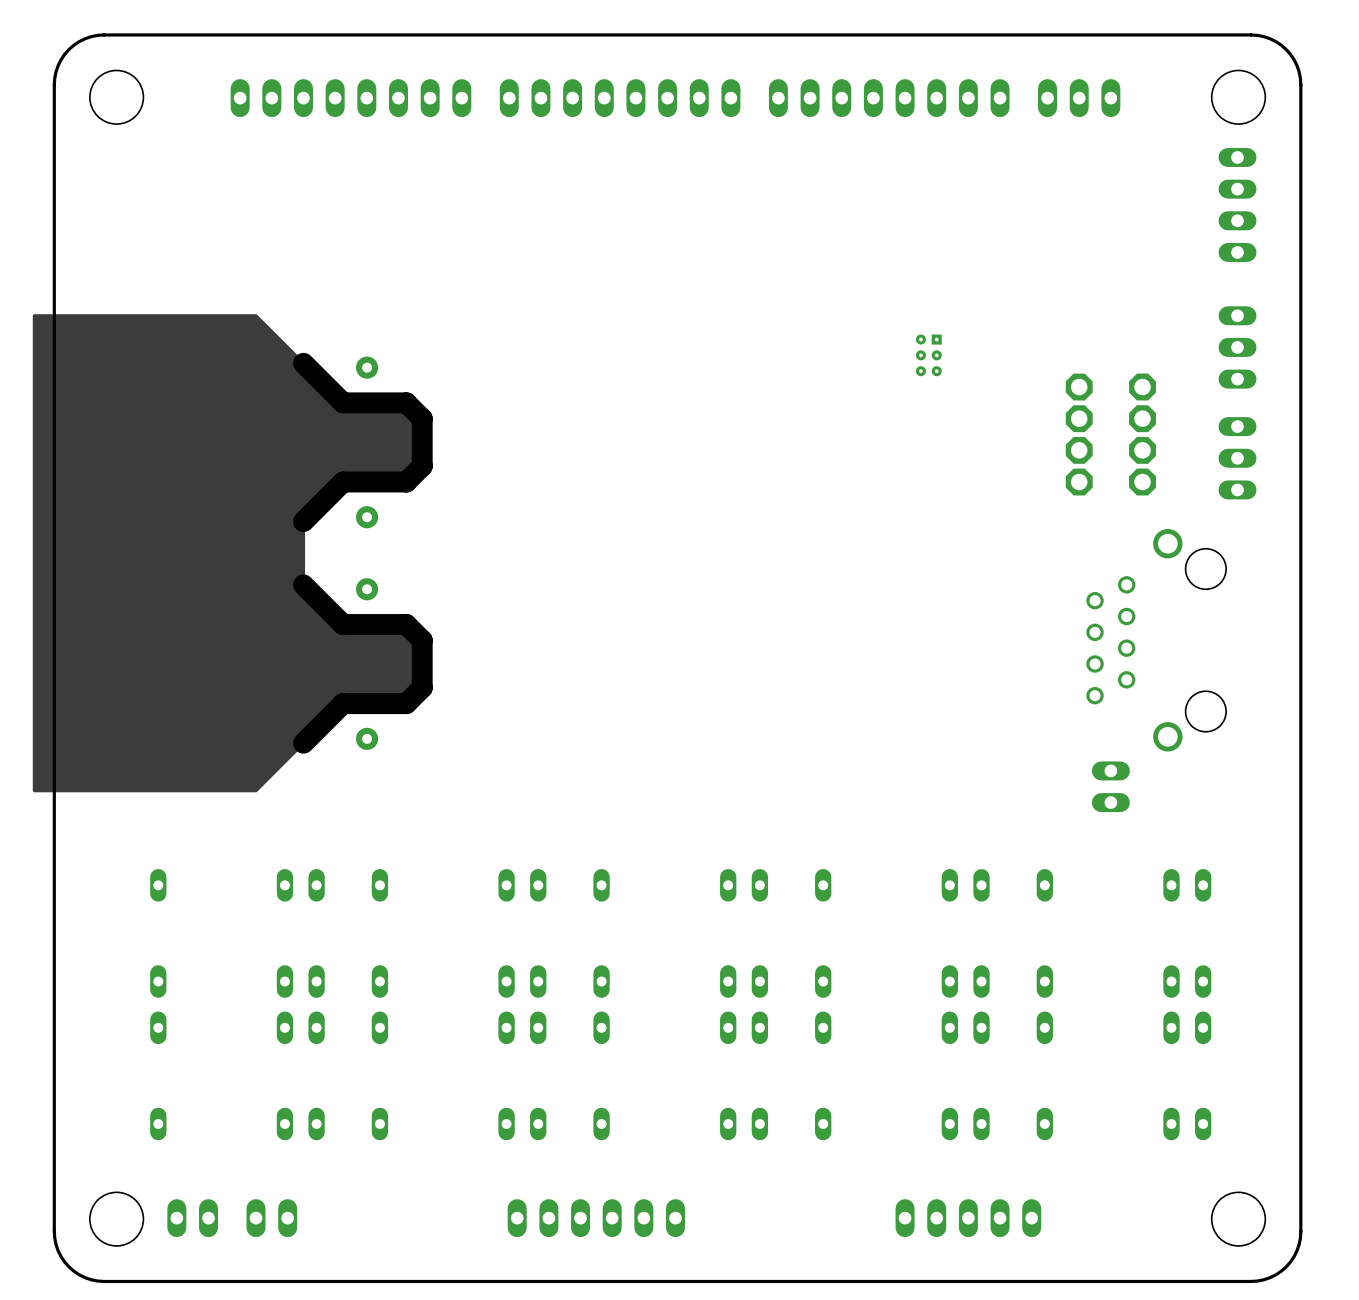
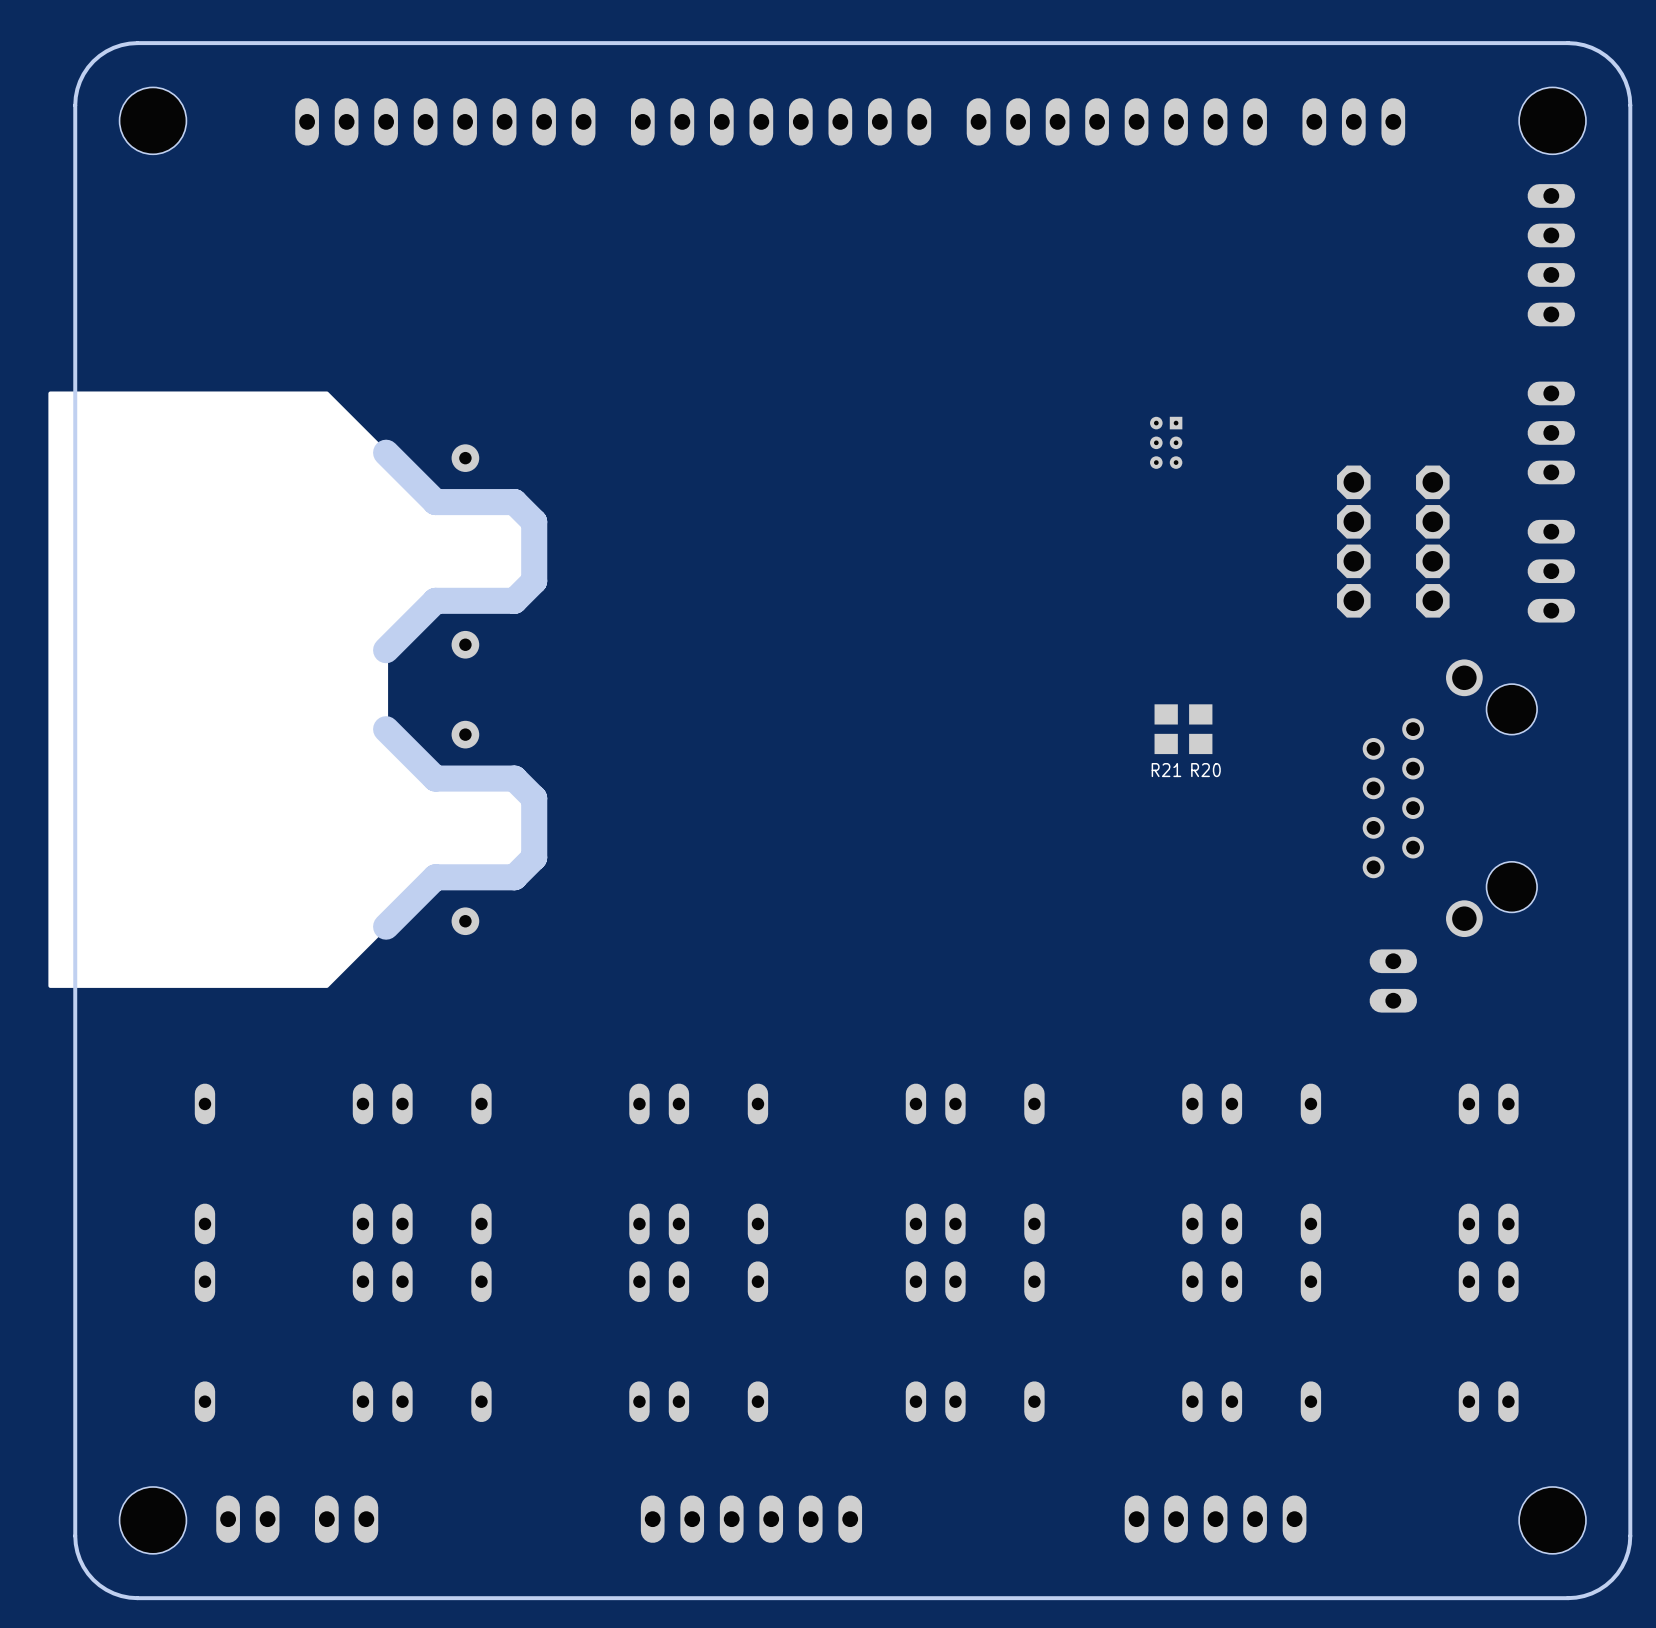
R21: none -> (1166, 729)
R20: none -> (1200, 729)

